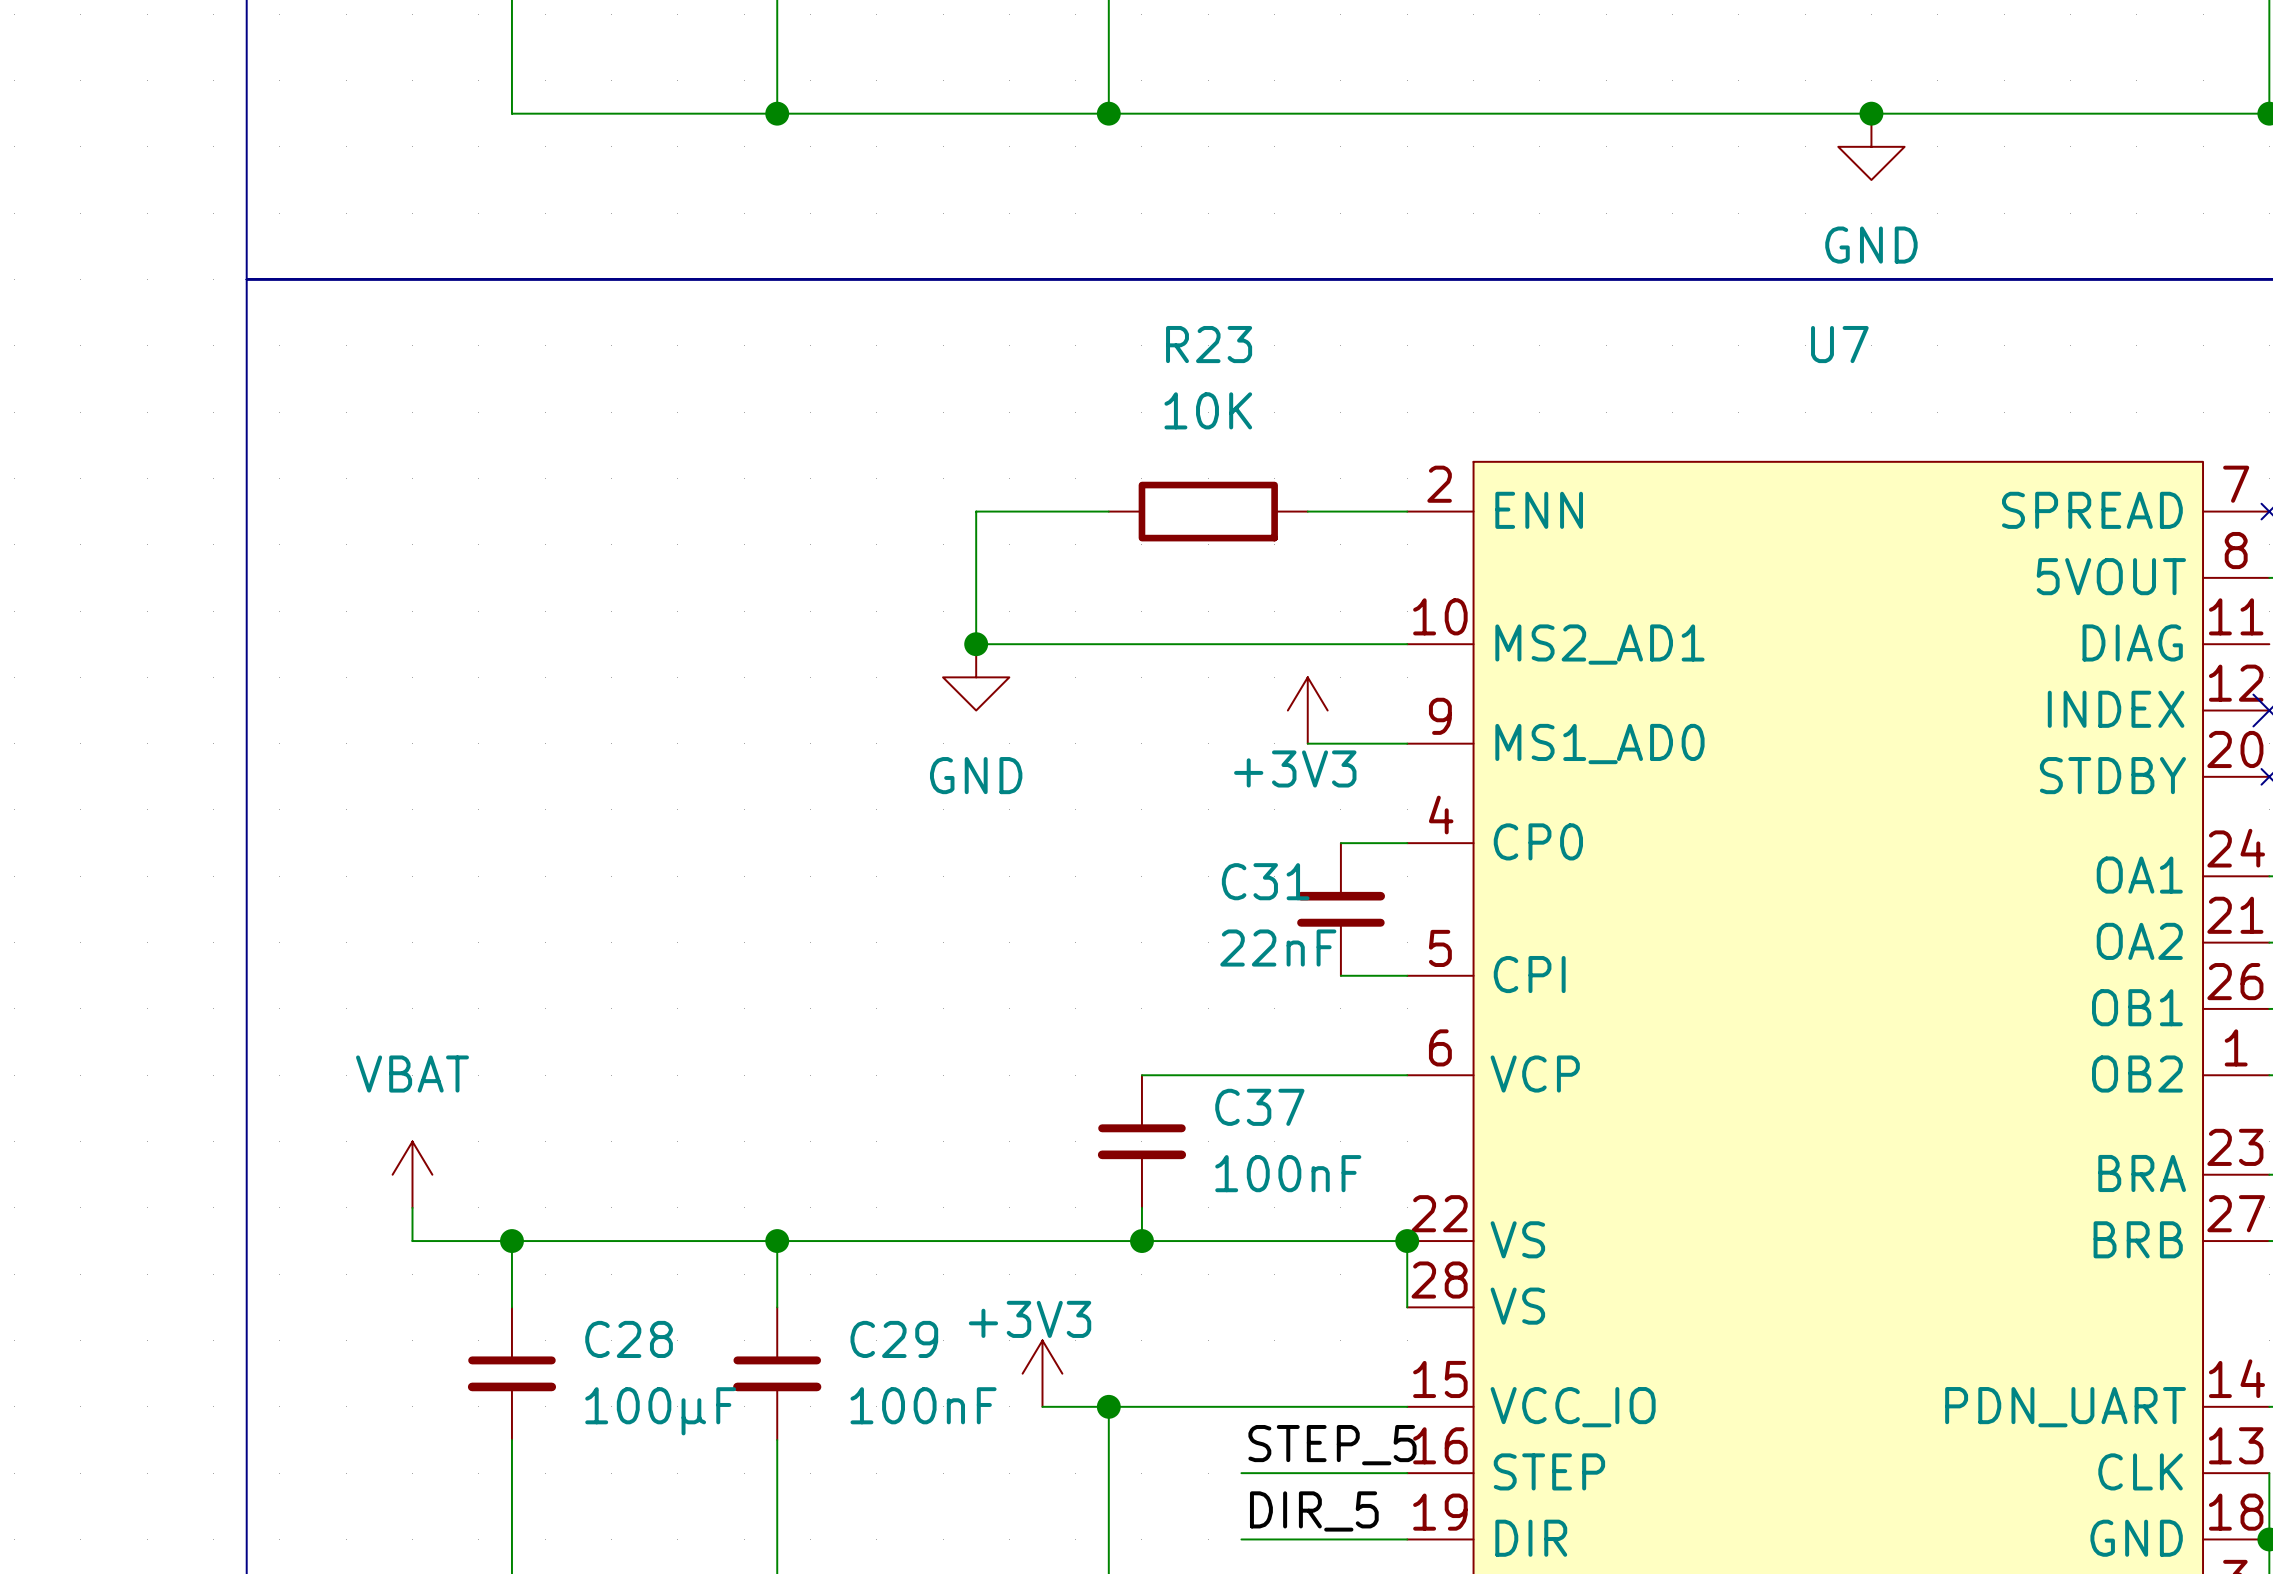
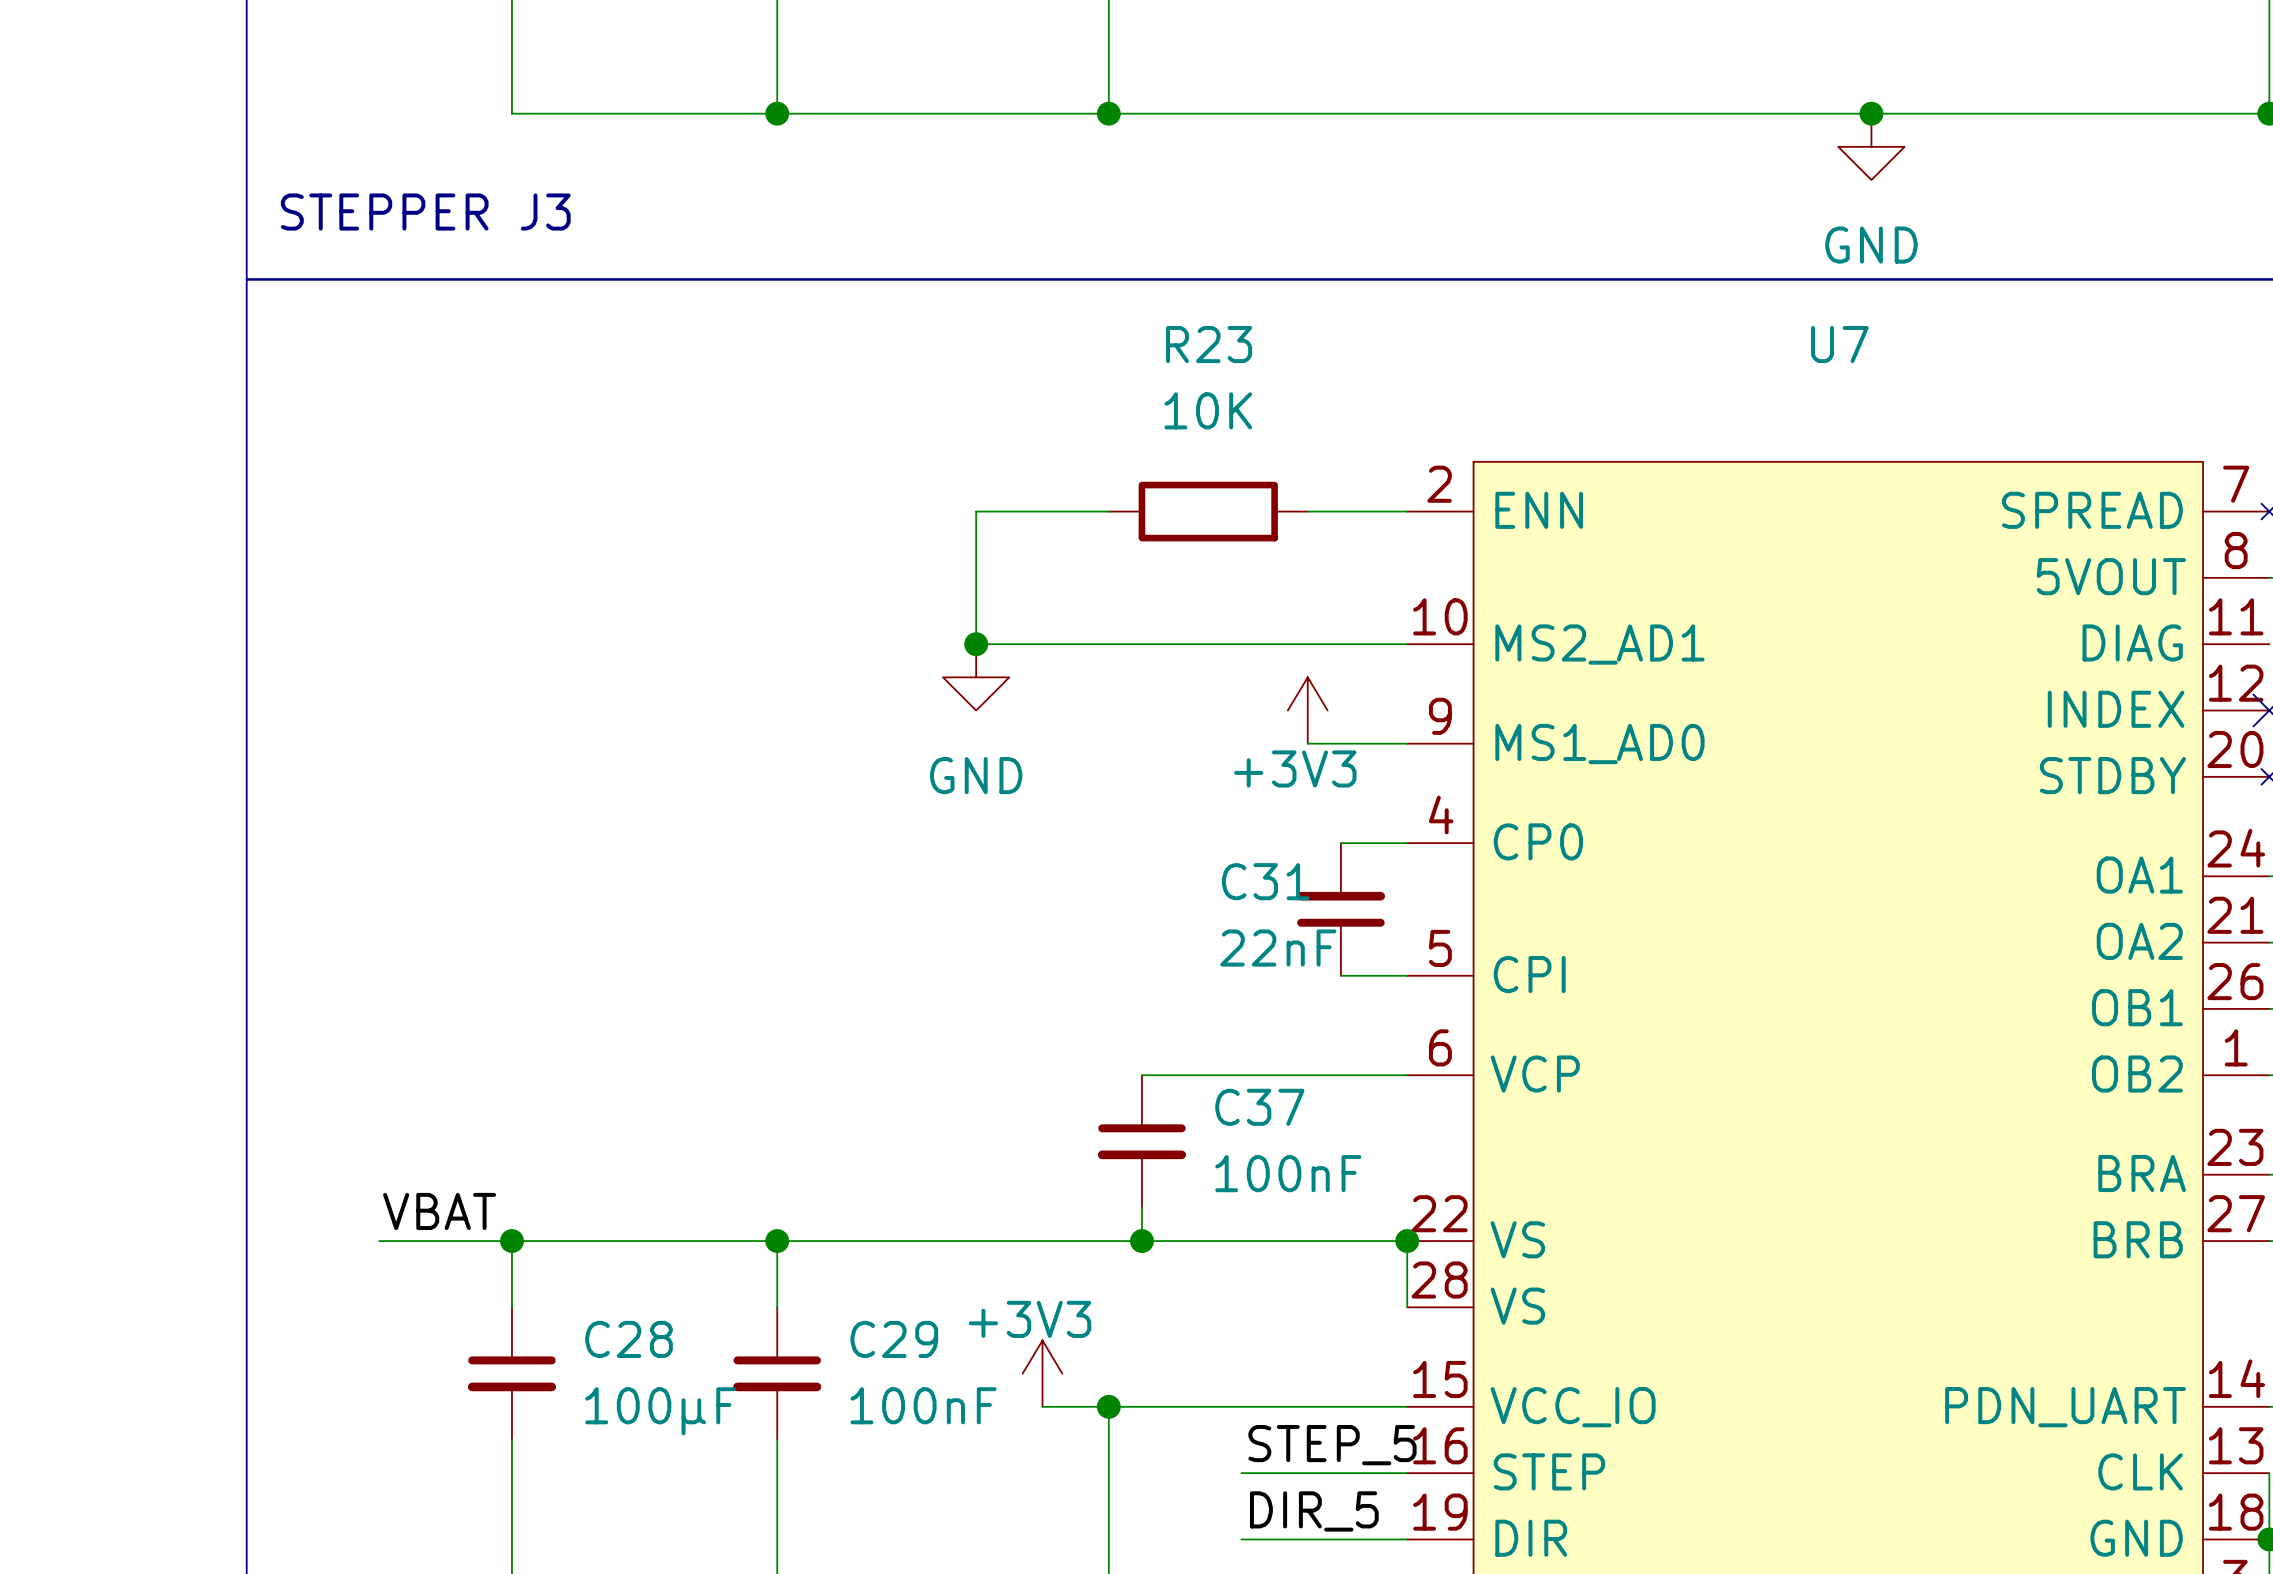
text: none -> STEPPER J3 (425, 212)
power symbol: VBAT (412, 1174) -> none
wire: (412, 1207) (412, 1241) -> (379, 1241) (412, 1241)
label: none -> VBAT (439, 1211)

